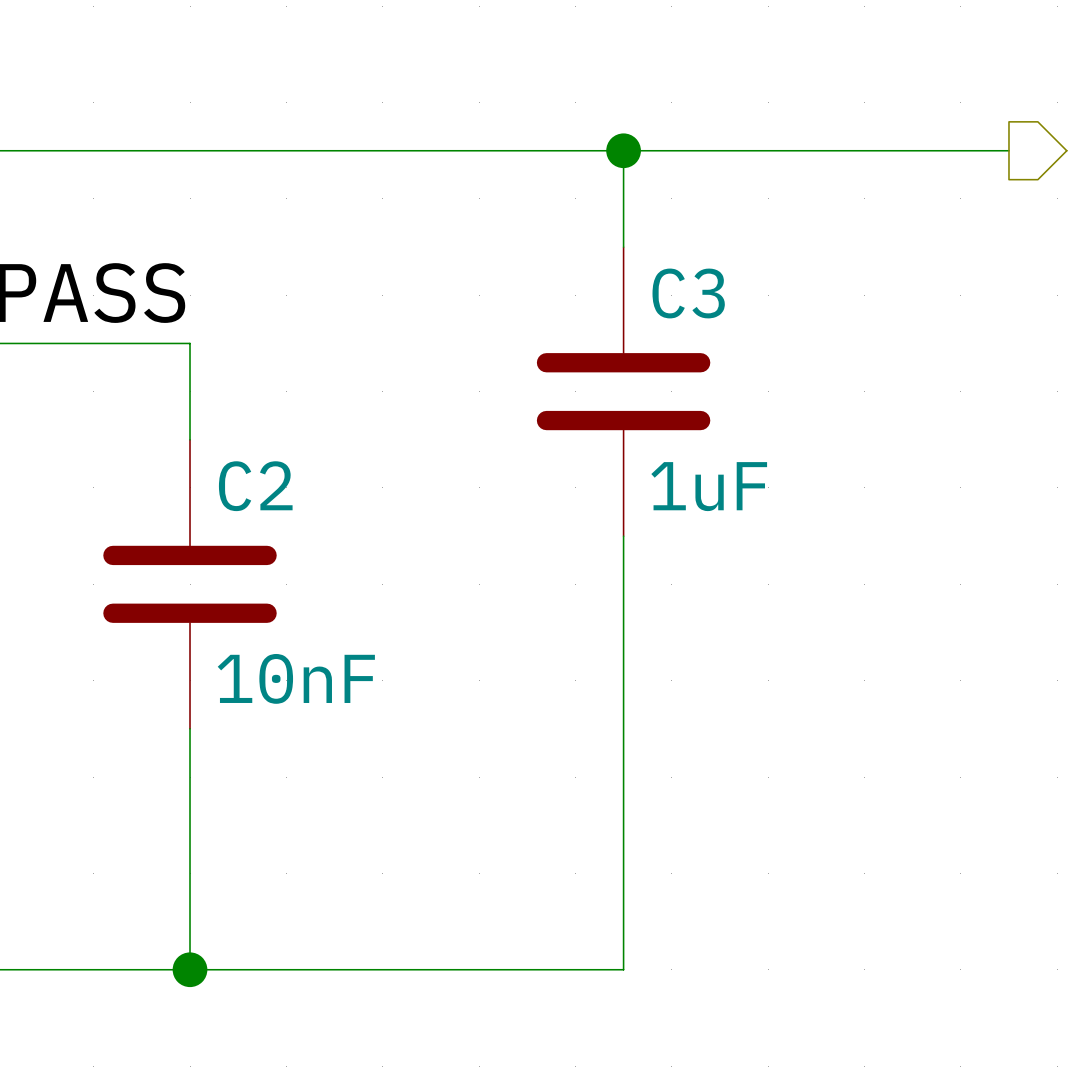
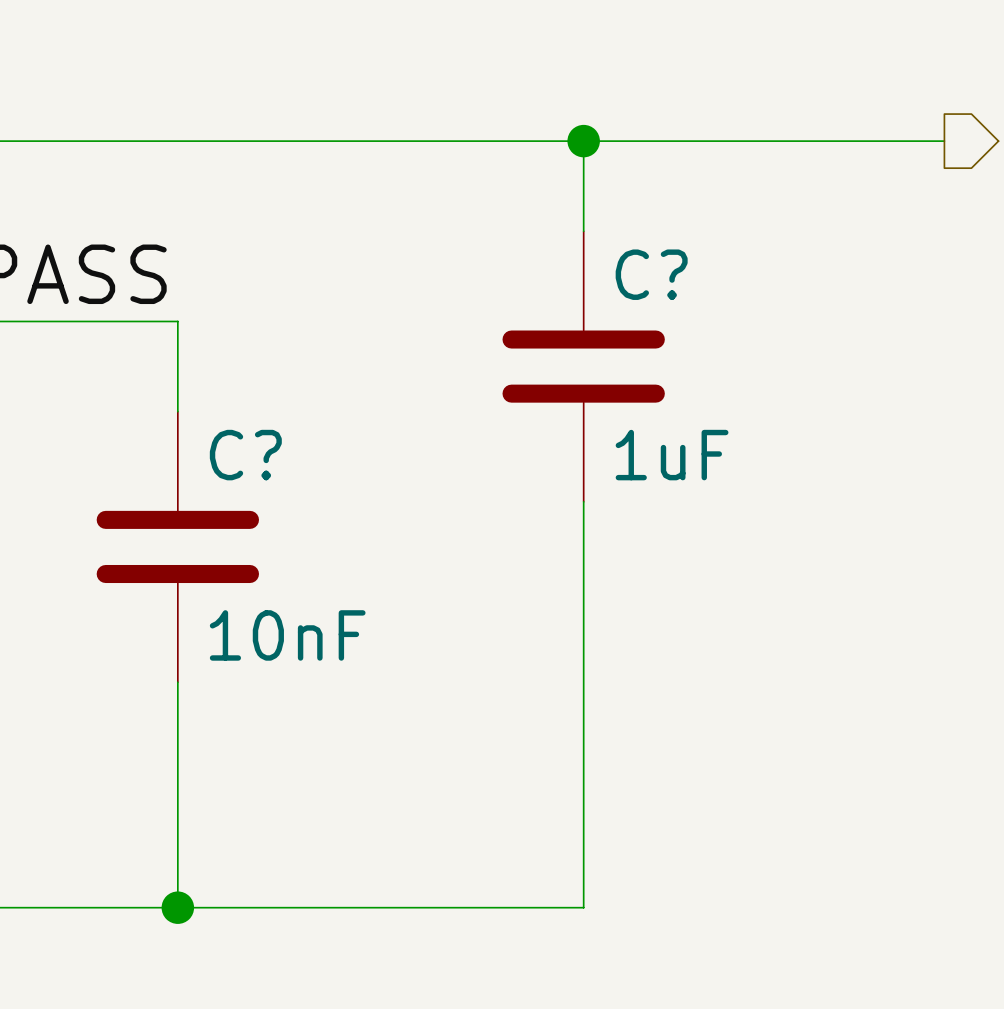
C3 name: C3 (688, 293) -> C? (651, 274)
C2 name: C2 (255, 486) -> C? (245, 455)

